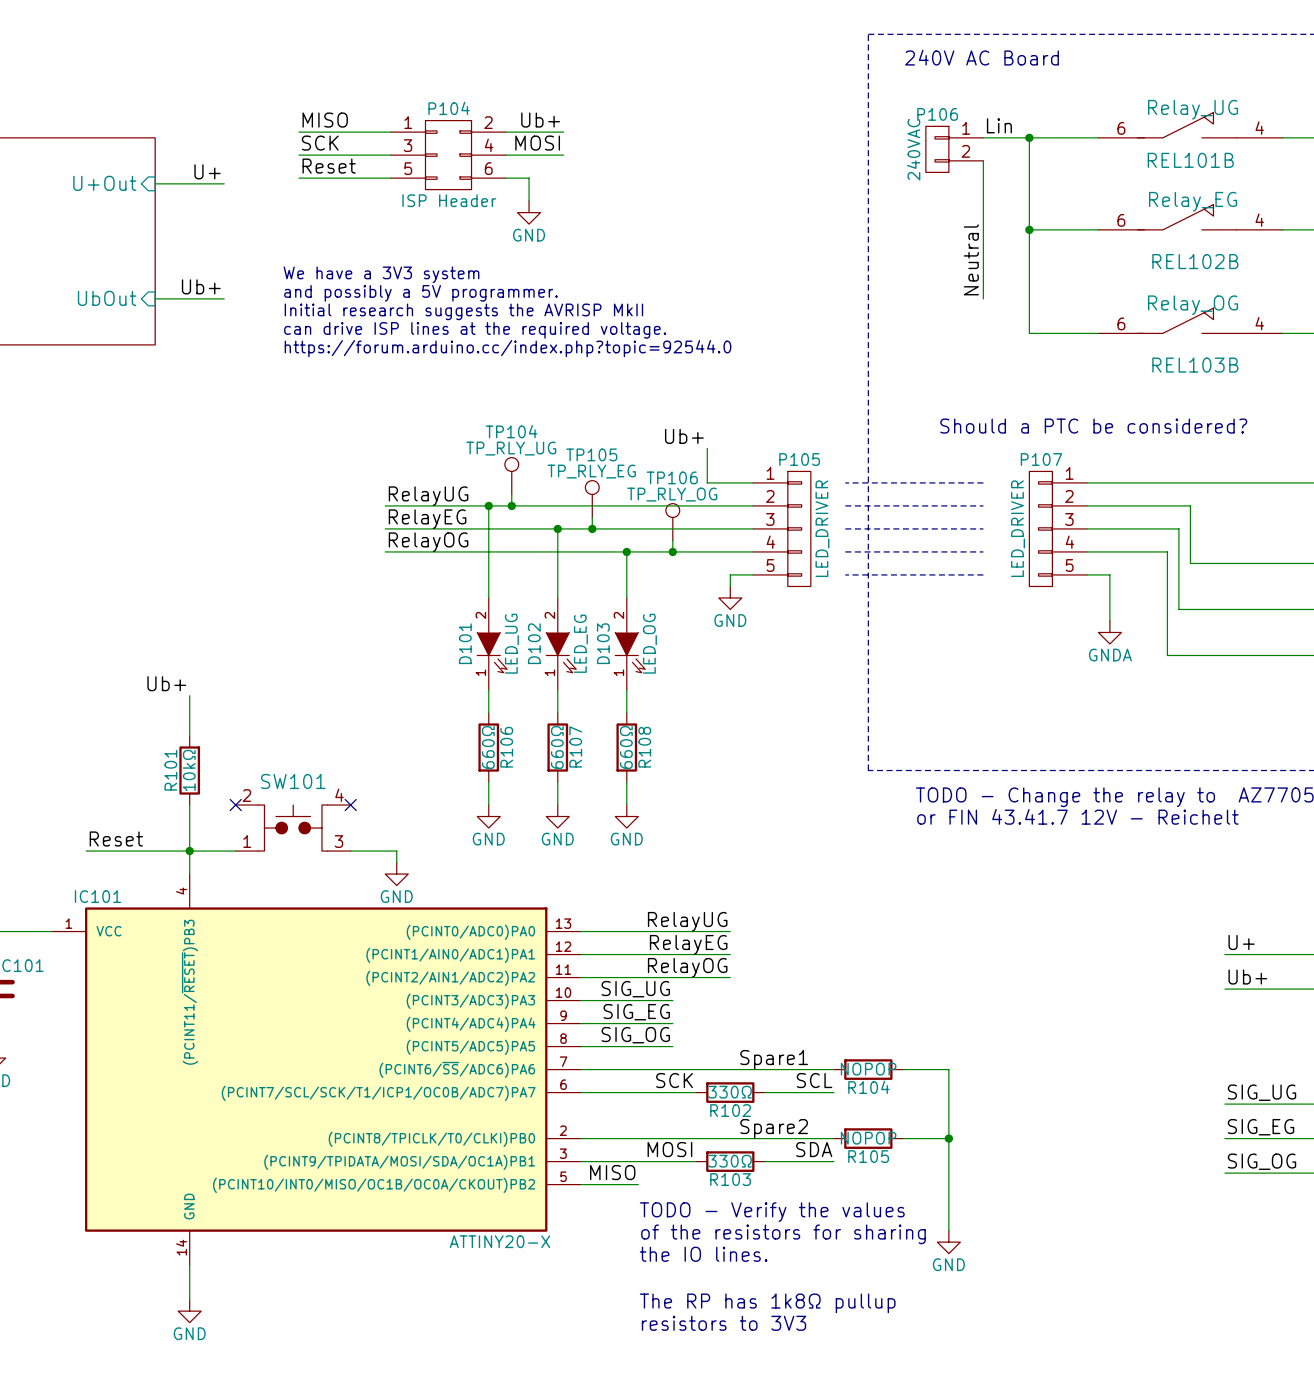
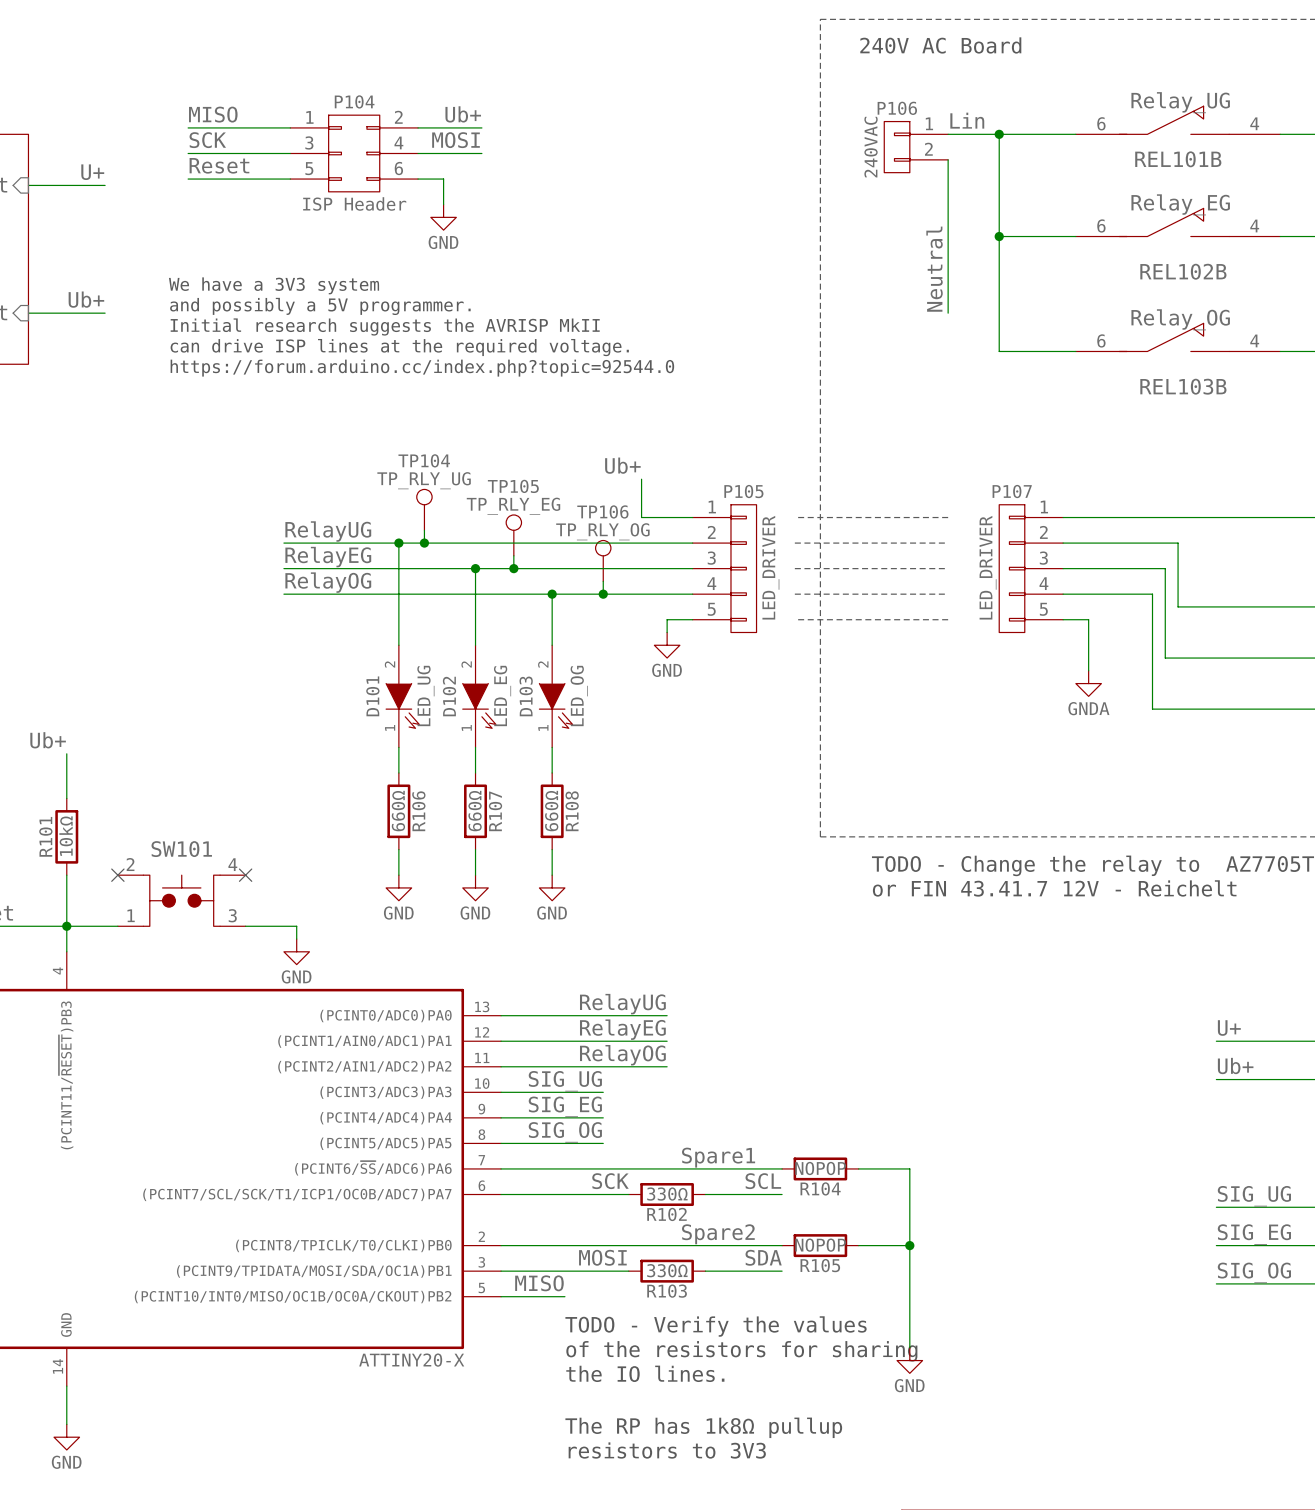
text: Should a PTC be considered? (1093, 426) -> none

